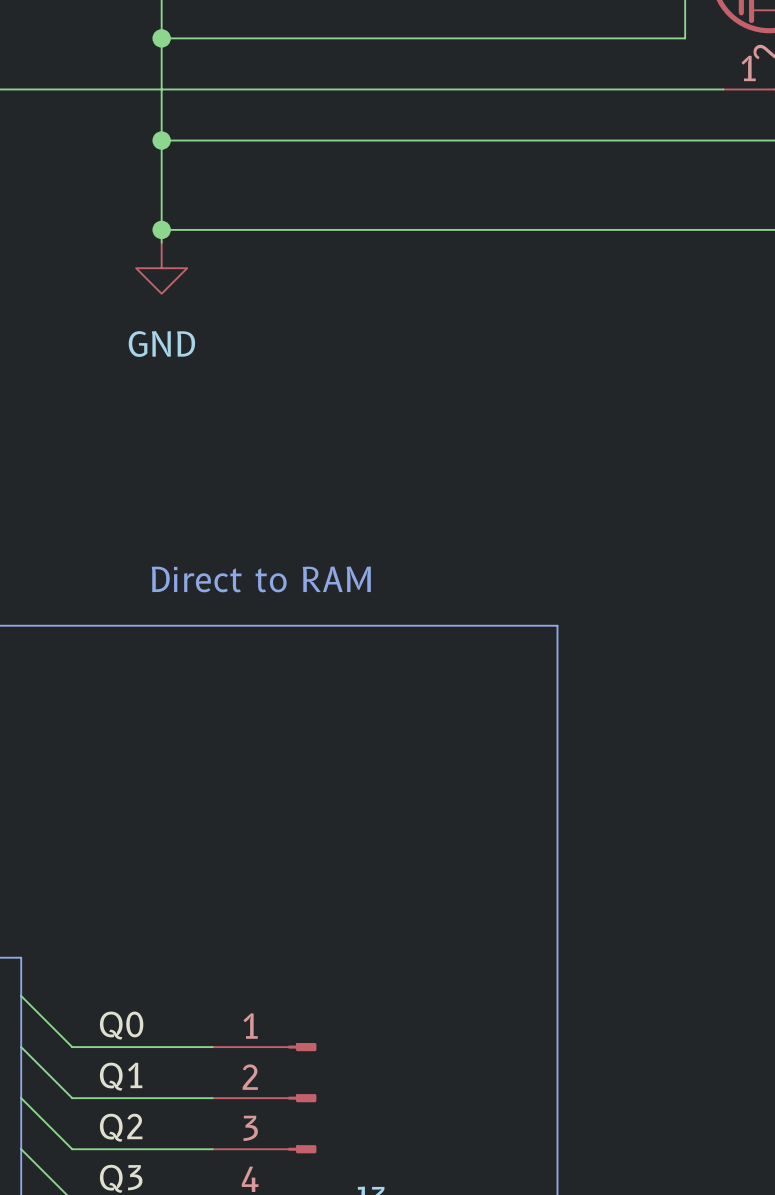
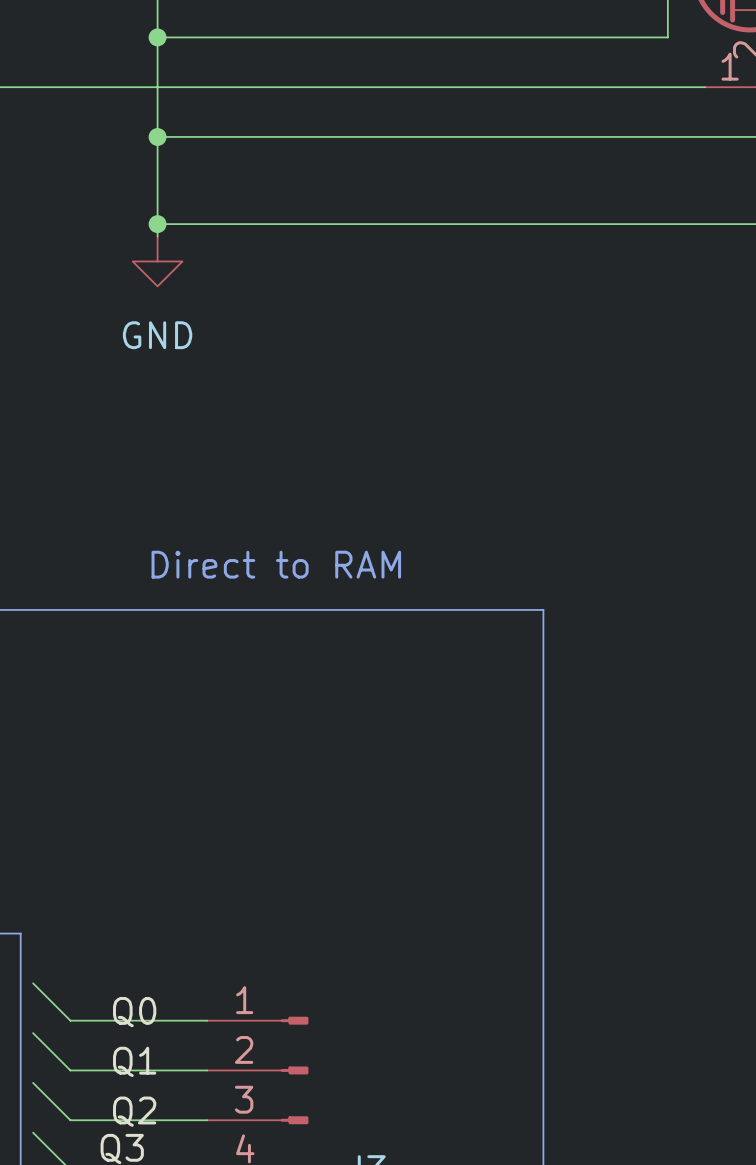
wire: (21, 996) (33, 1008) -> none
label position: Q0 (121, 1025) -> Q0 (134, 1012)
wire: (21, 1047) (33, 1059) -> none
label position: Q1 (121, 1076) -> Q1 (134, 1061)
wire: (21, 1098) (33, 1110) -> none
label position: Q2 (121, 1127) -> Q2 (134, 1111)
wire: (21, 1149) (33, 1162) -> none

